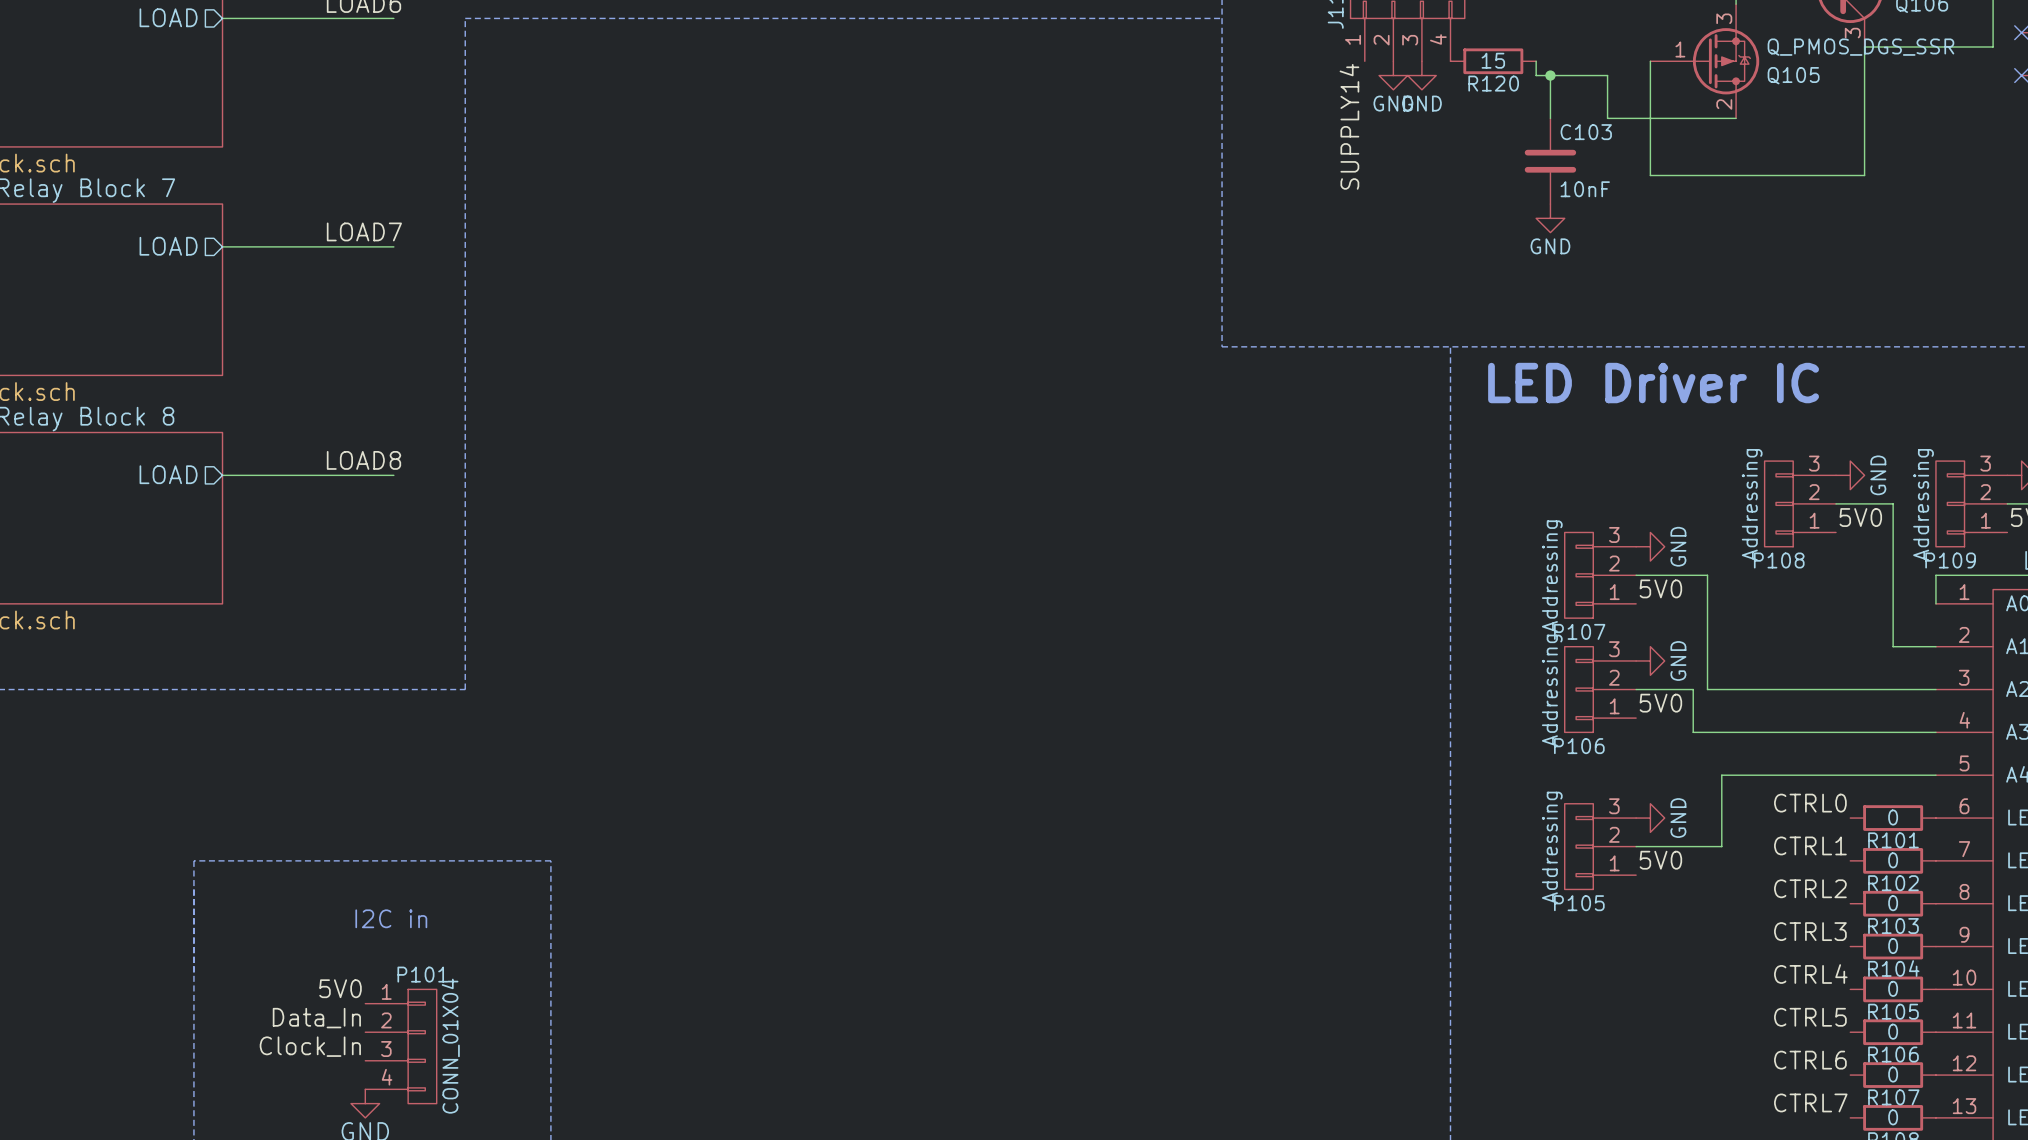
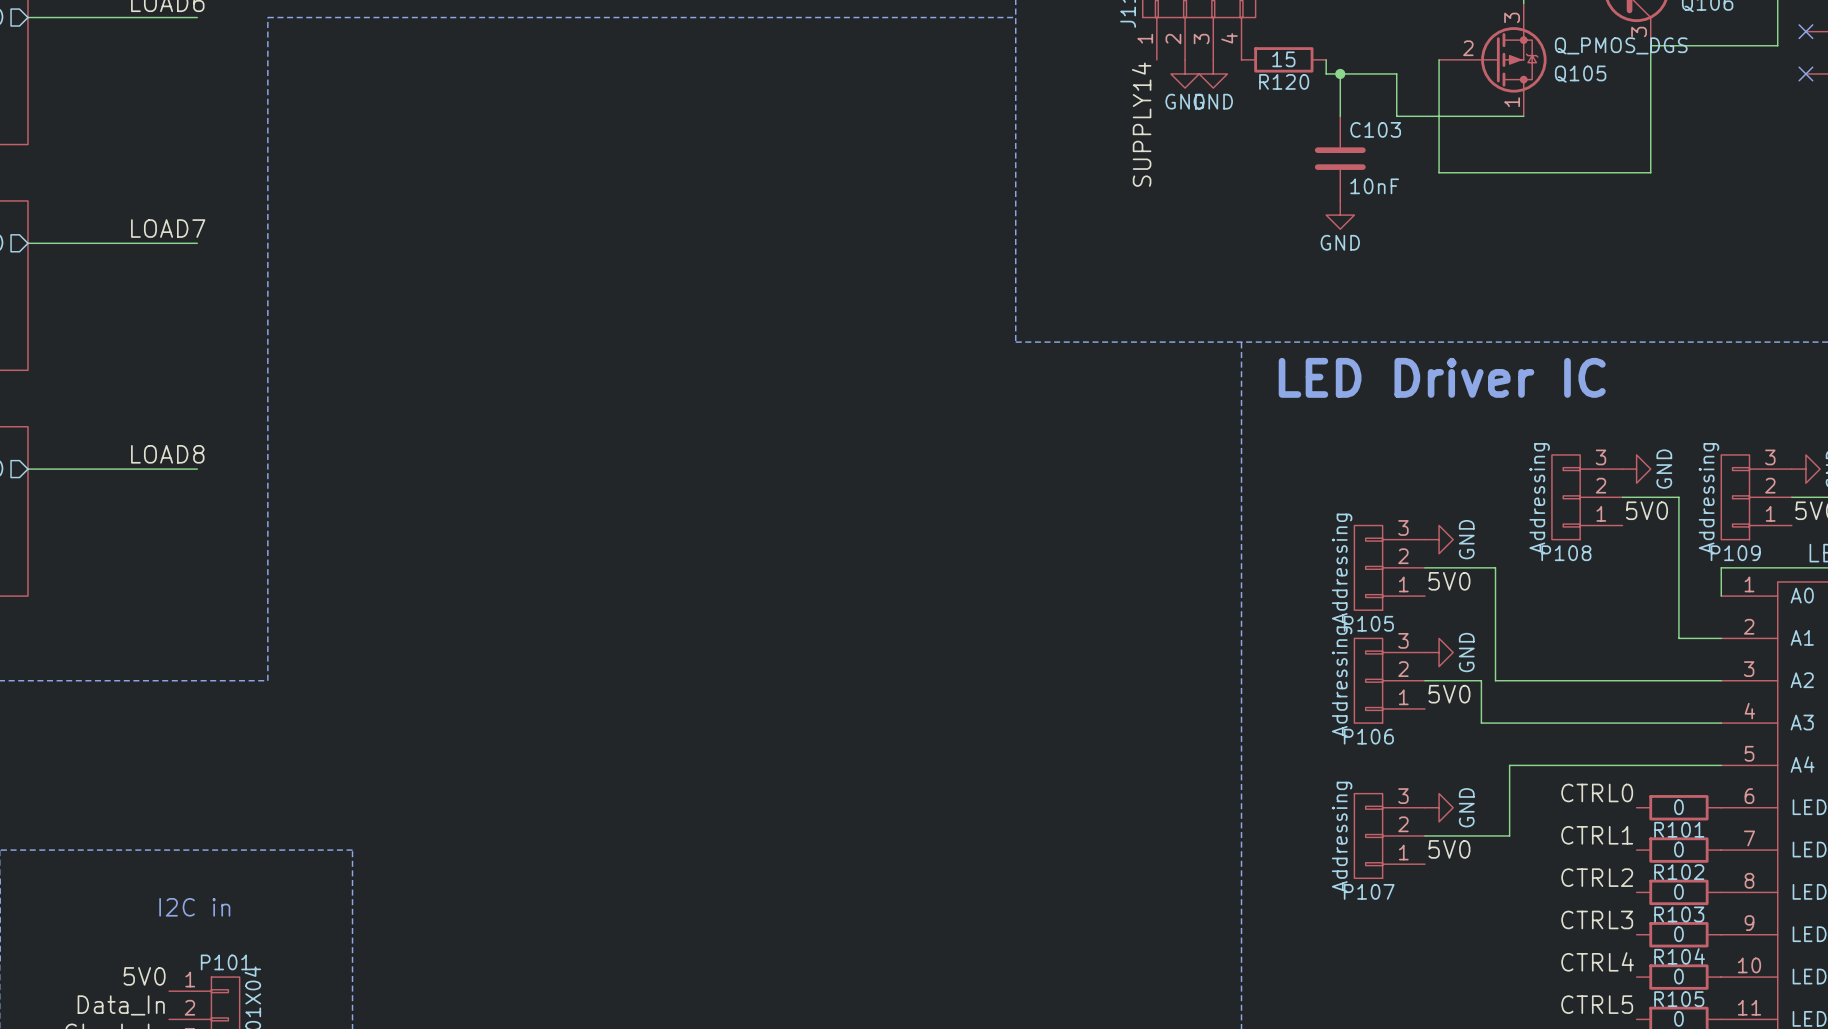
Q105 value: Q_PMOS_DGS_SSR (1860, 47) -> Q_PMOS_DGS (1621, 45)
Q105 pin number: 1 (1680, 49) -> 2 (1468, 48)
Q105 pin number: 2 (1724, 104) -> 1 (1512, 102)
P107 name: P107 (1579, 631) -> P105 (1368, 623)
P105 name: P105 (1579, 903) -> P107 (1369, 891)

